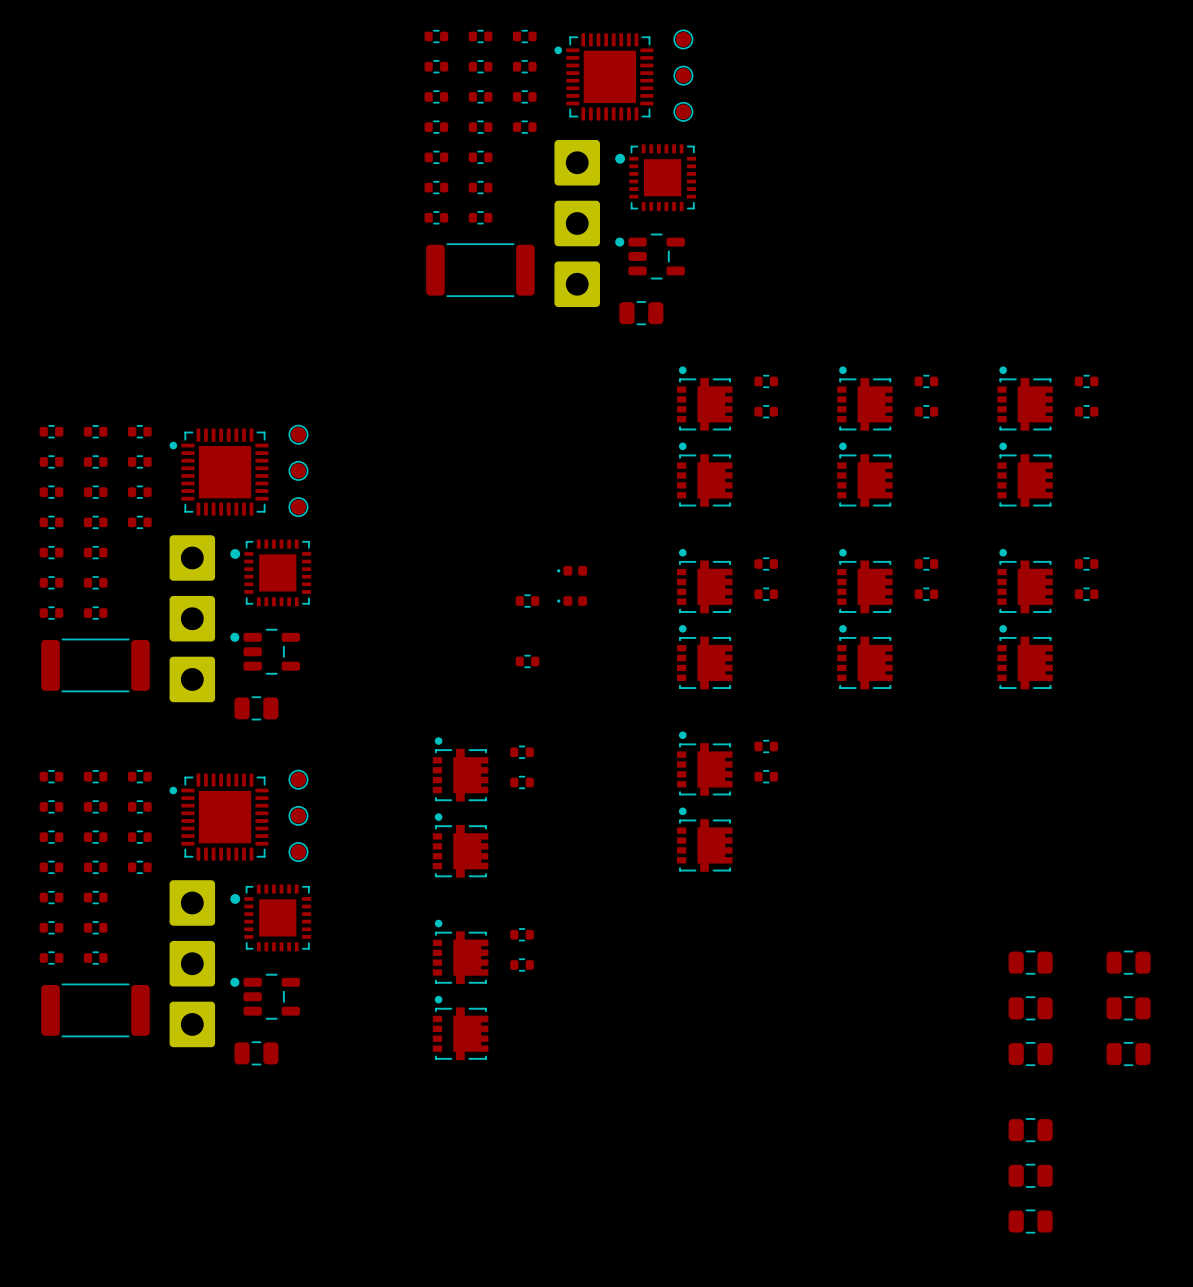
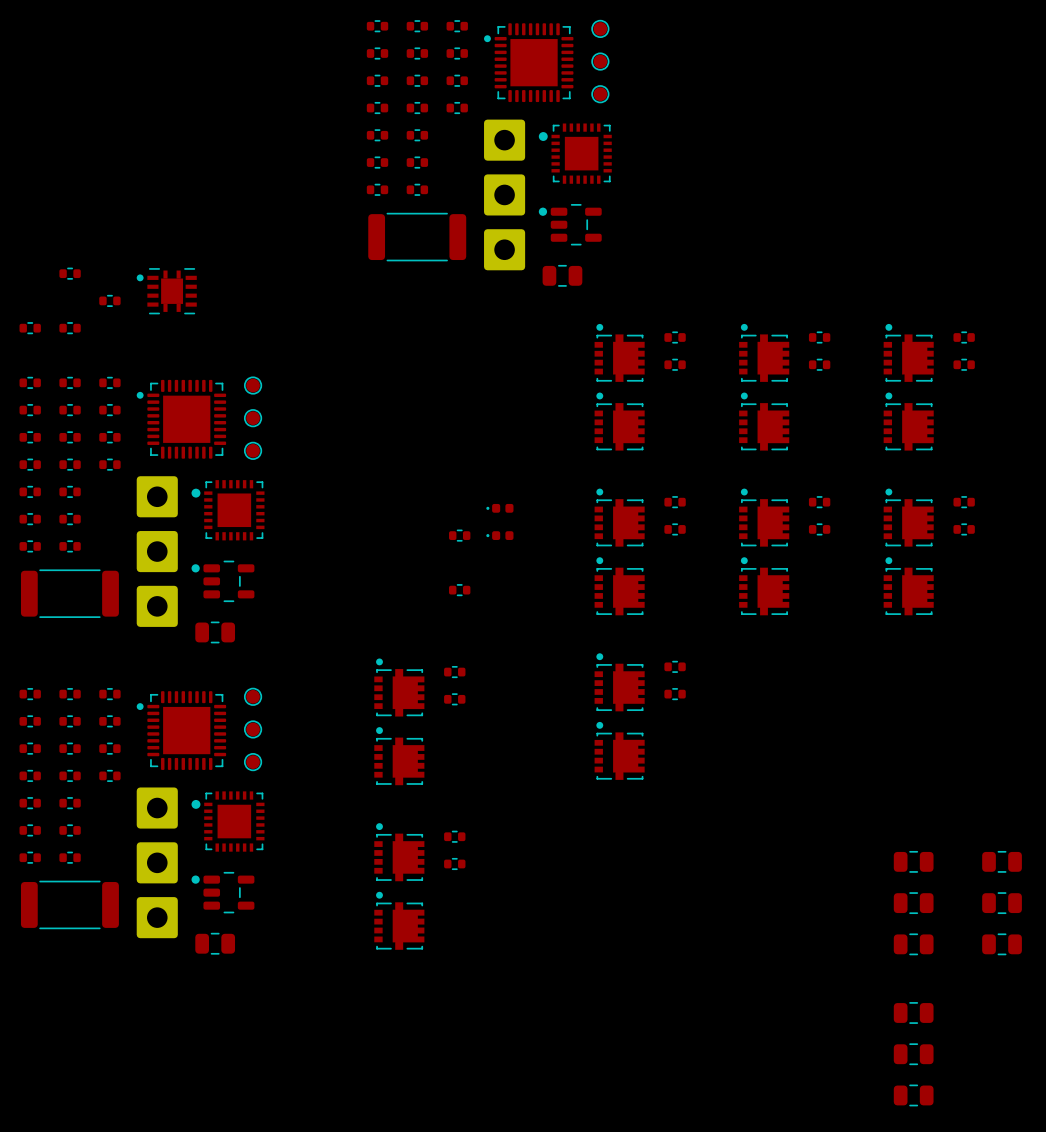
part: none -> (70, 273)
part: none -> (166, 291)
part: none -> (109, 300)
part: none -> (30, 328)
part: none -> (70, 328)

